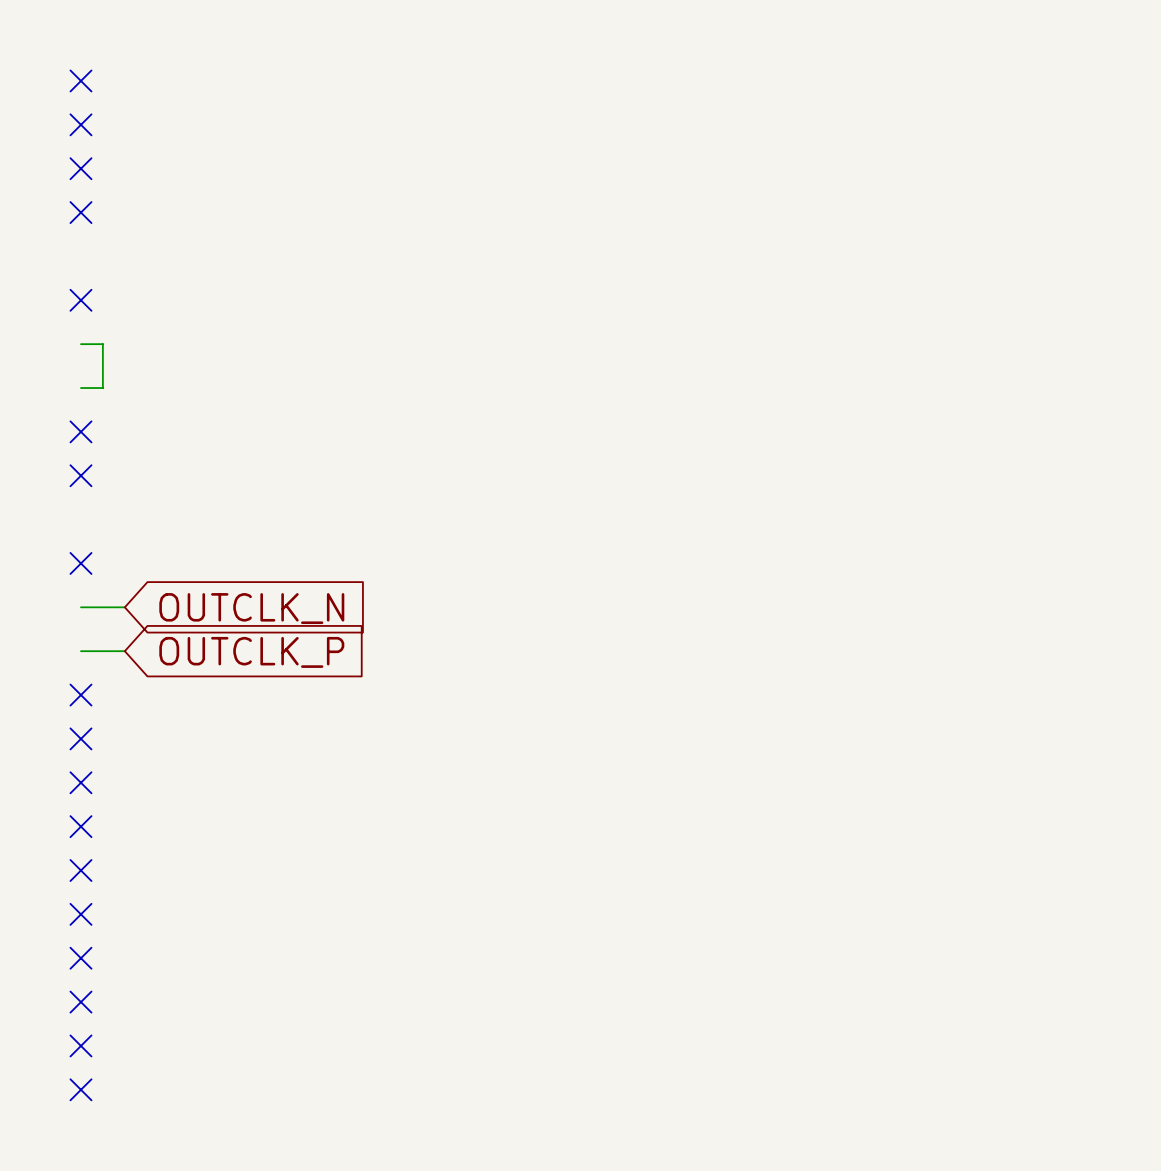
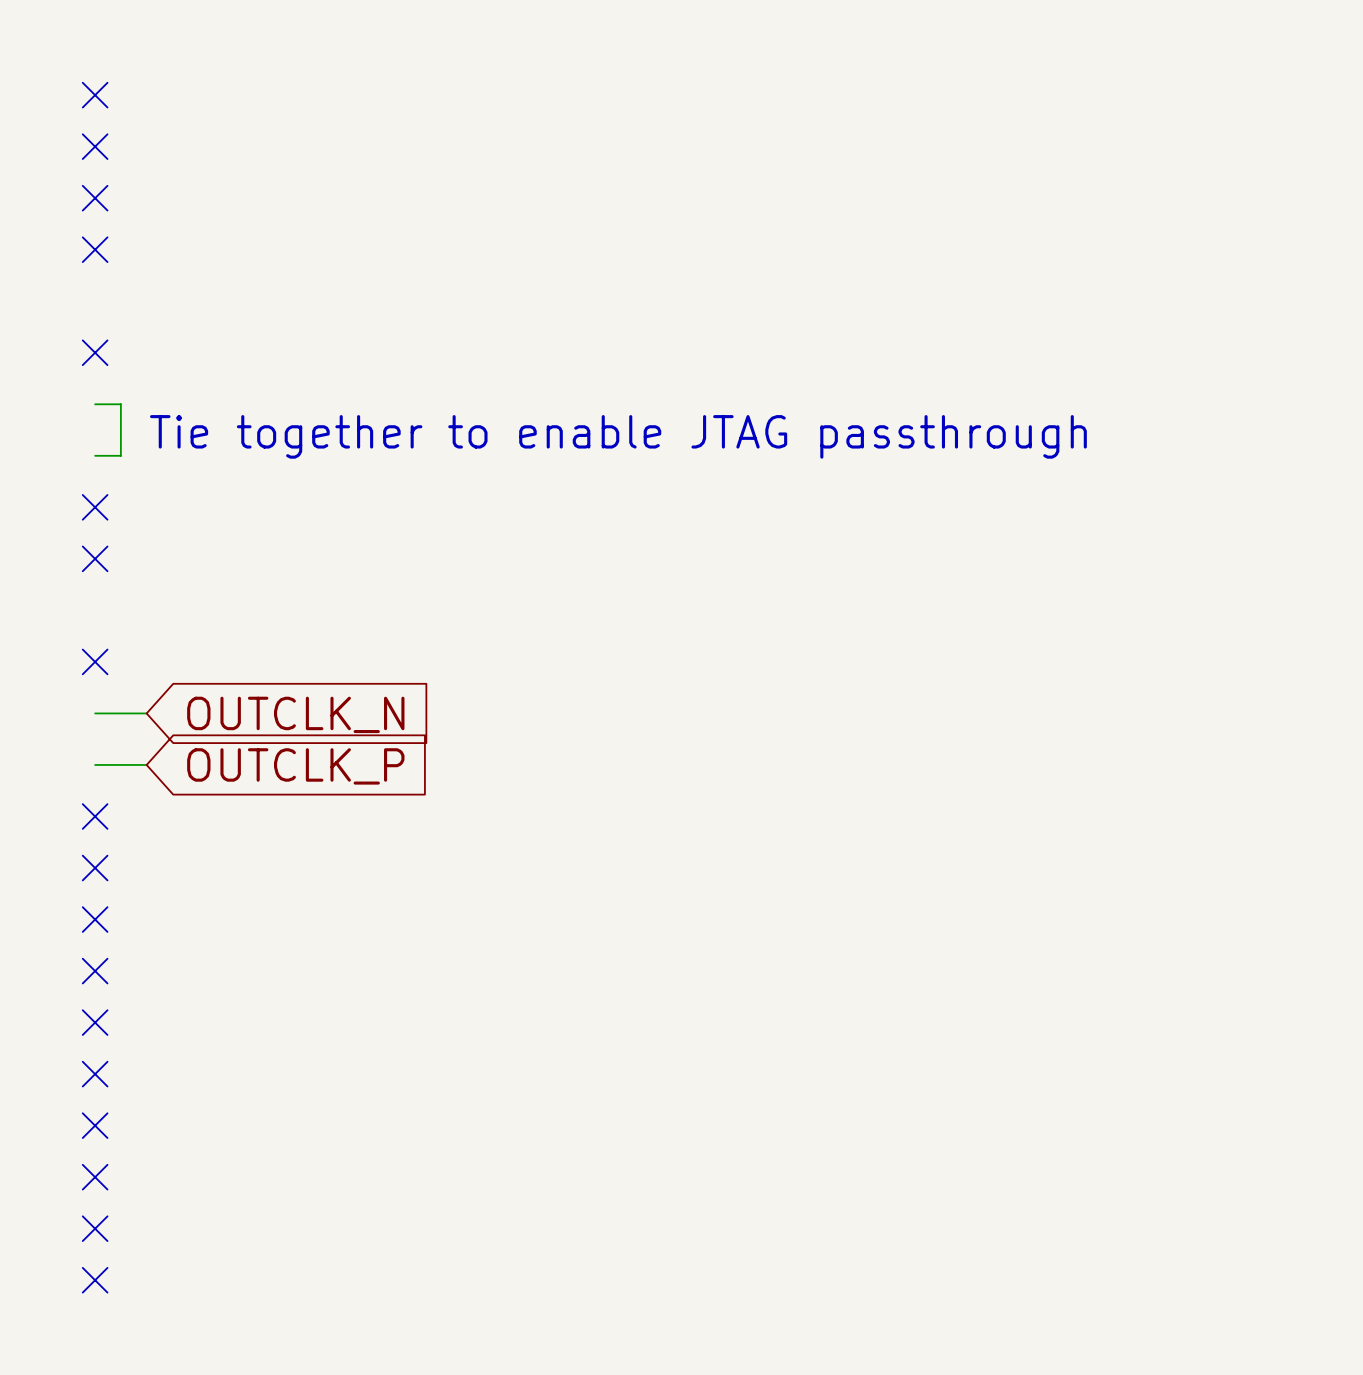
text: none -> Tie together to enable JTAG passthrough (618, 436)

